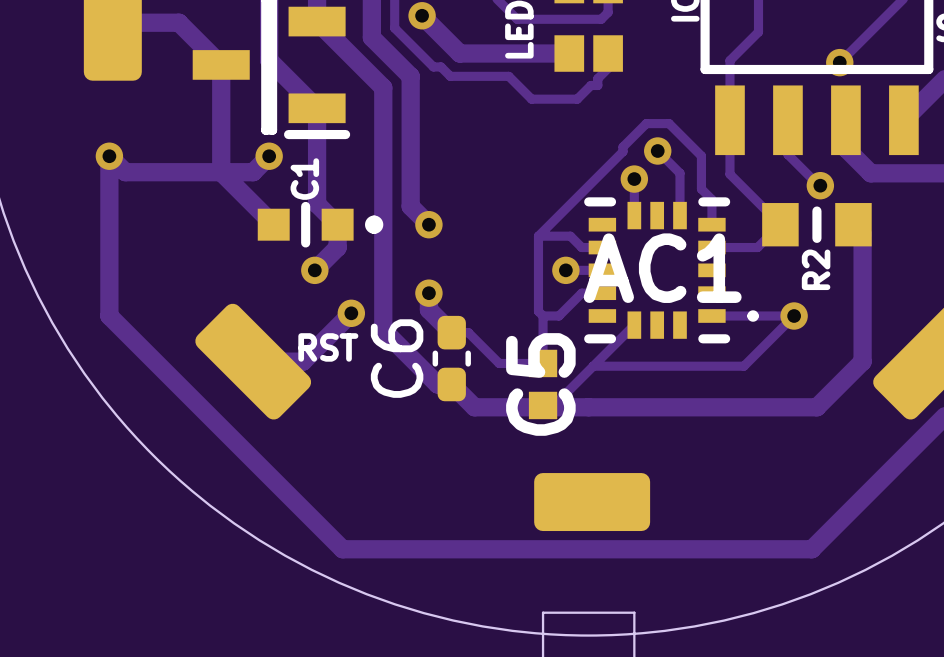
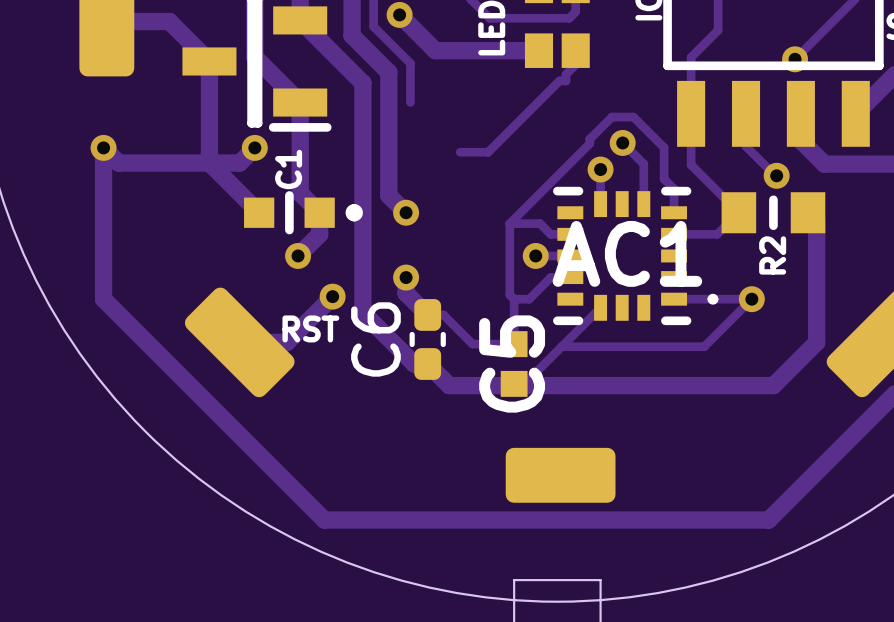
track: (433, 66) (440, 66) (450, 76) (508, 76) (531, 99) (577, 99) -> (460, 152) (488, 152) (546, 93)
track: none -> (410, 63) (410, 102)

